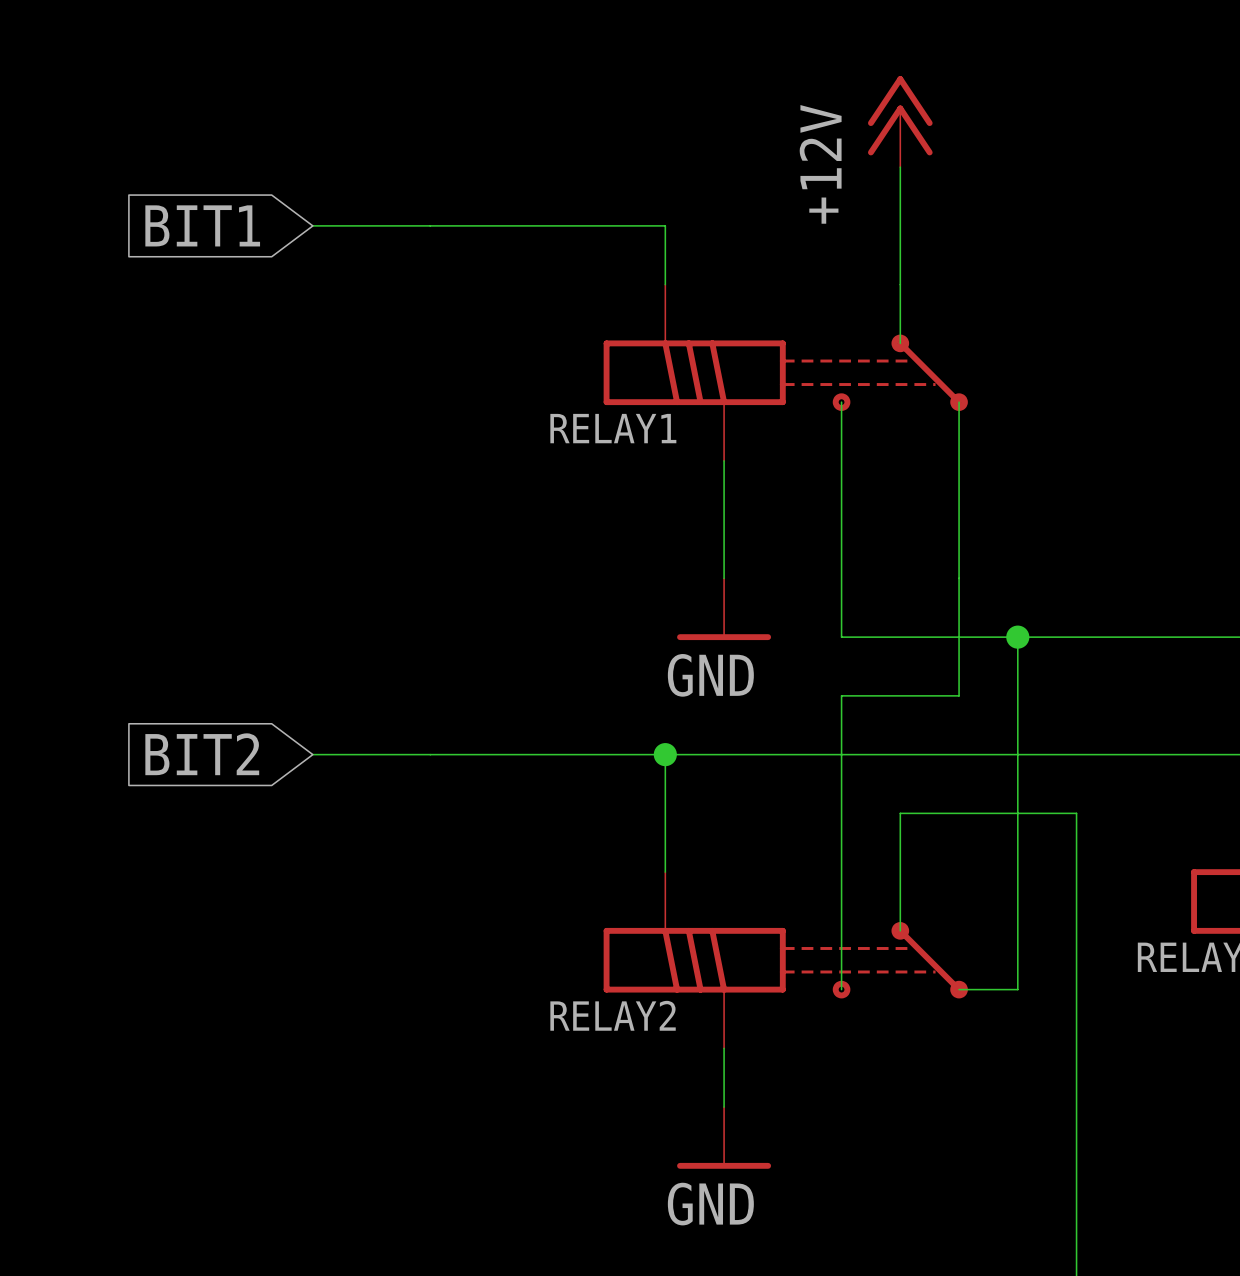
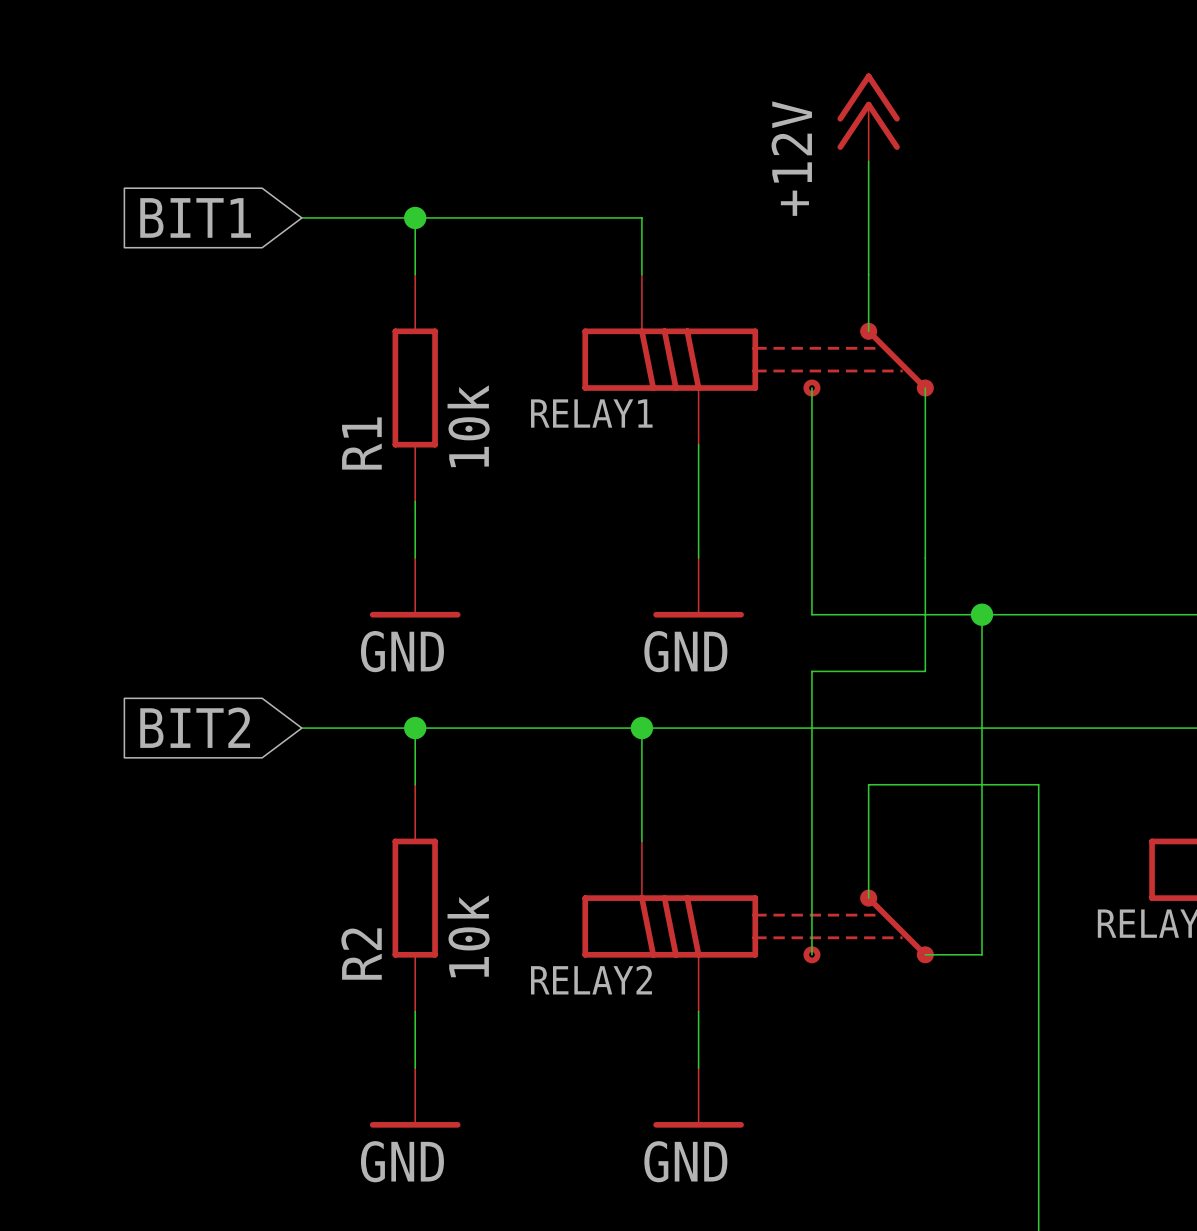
wire: none -> (415, 217) (415, 274)
junction: none -> (415, 217)
R1: none -> 10k (415, 388)
wire: none -> (415, 501) (415, 558)
power symbol: none -> GND (415, 587)
wire: none -> (415, 728) (415, 784)
junction: none -> (415, 728)
R2: none -> 10k (415, 898)
wire: none -> (415, 1011) (415, 1068)
power symbol: none -> GND (415, 1097)

